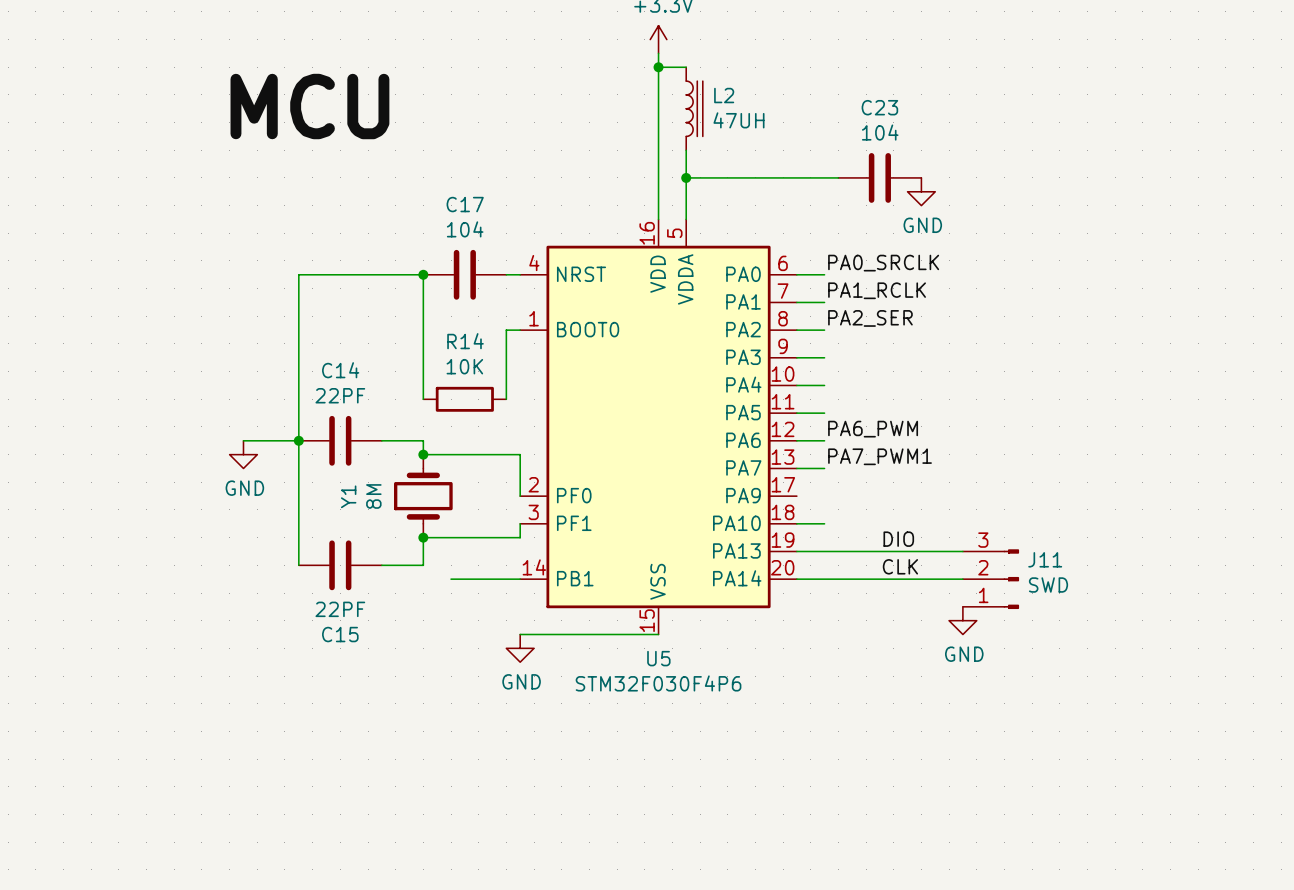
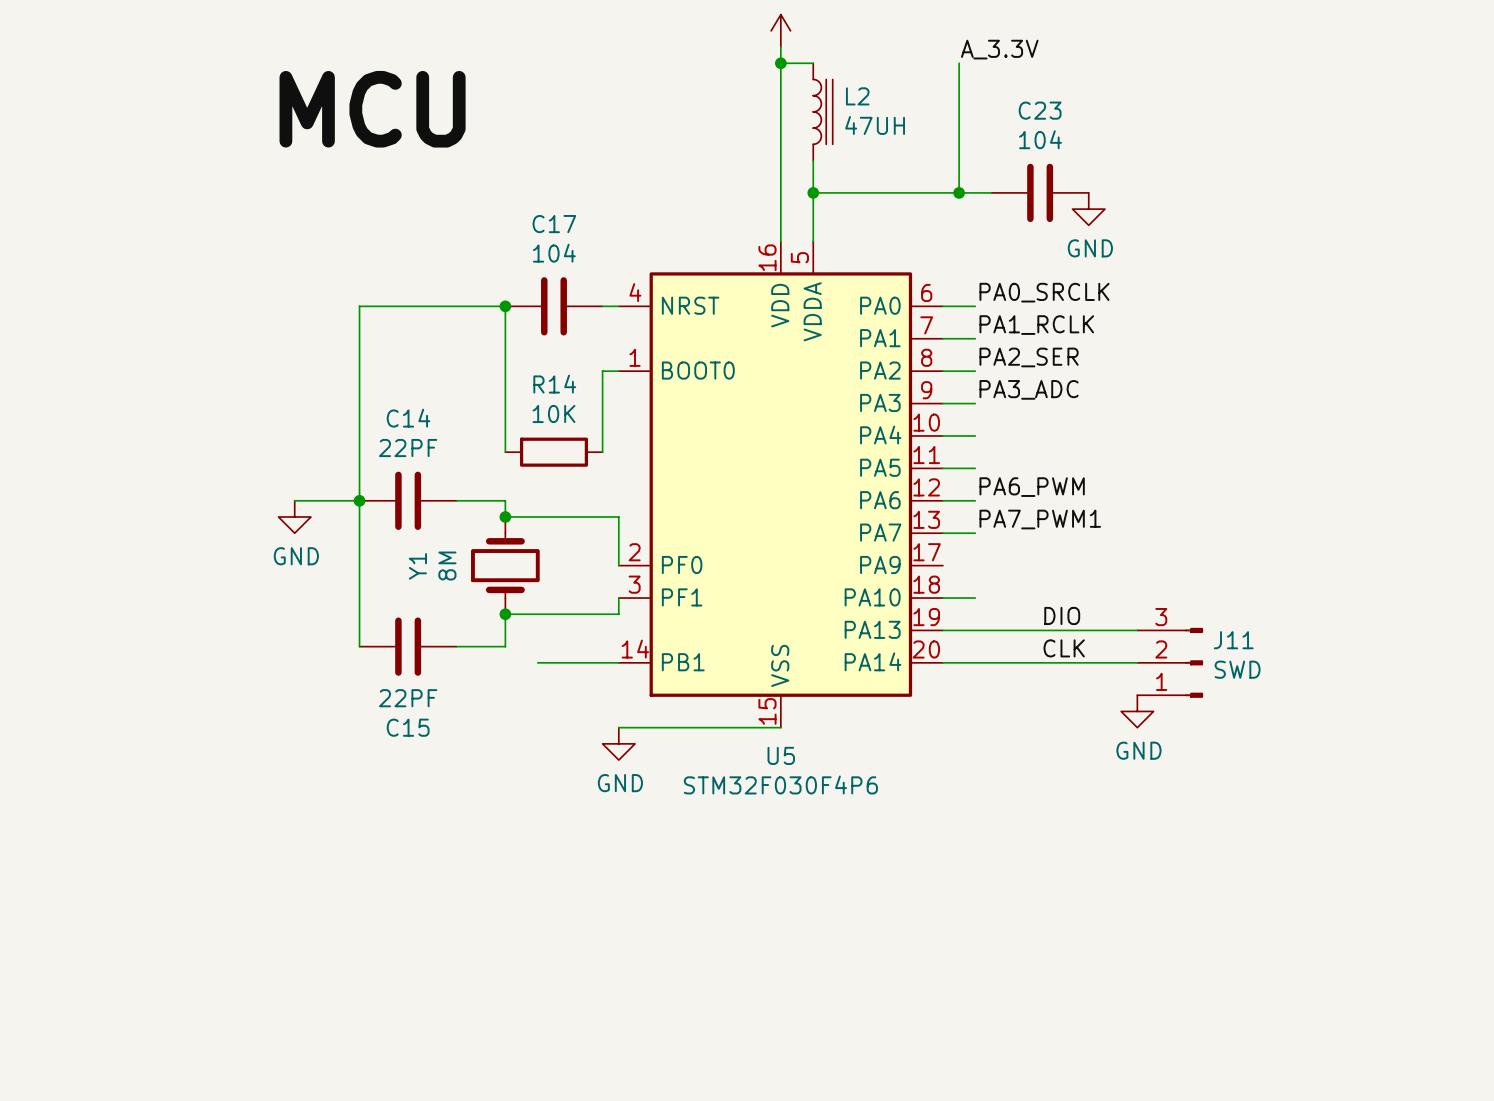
label: none -> A_3.3V (999, 49)
wire: none -> (959, 63) (959, 192)
junction: none -> (959, 192)
label: none -> PA3_ADC (1029, 389)

